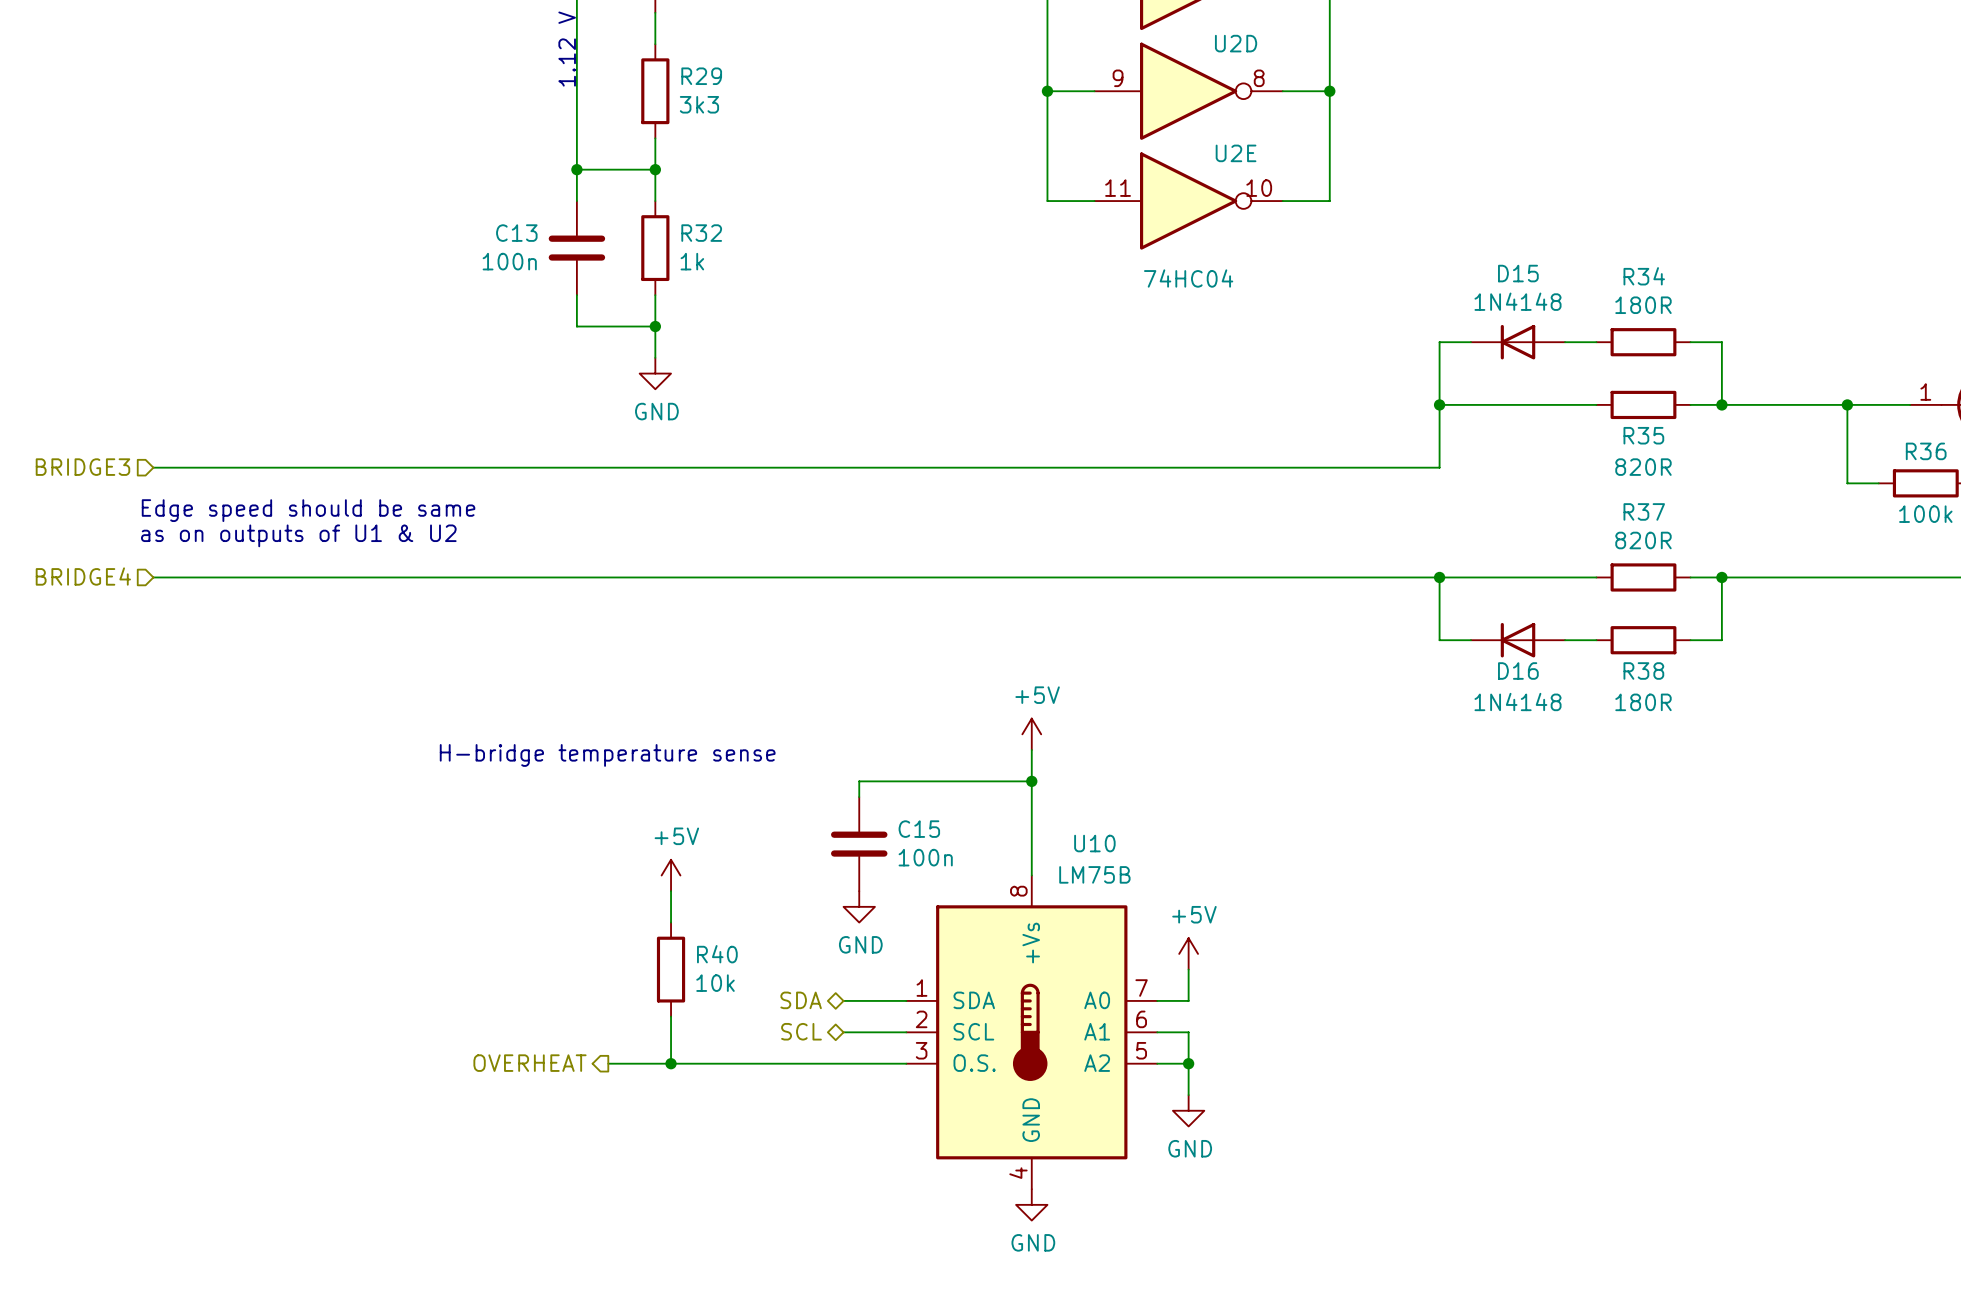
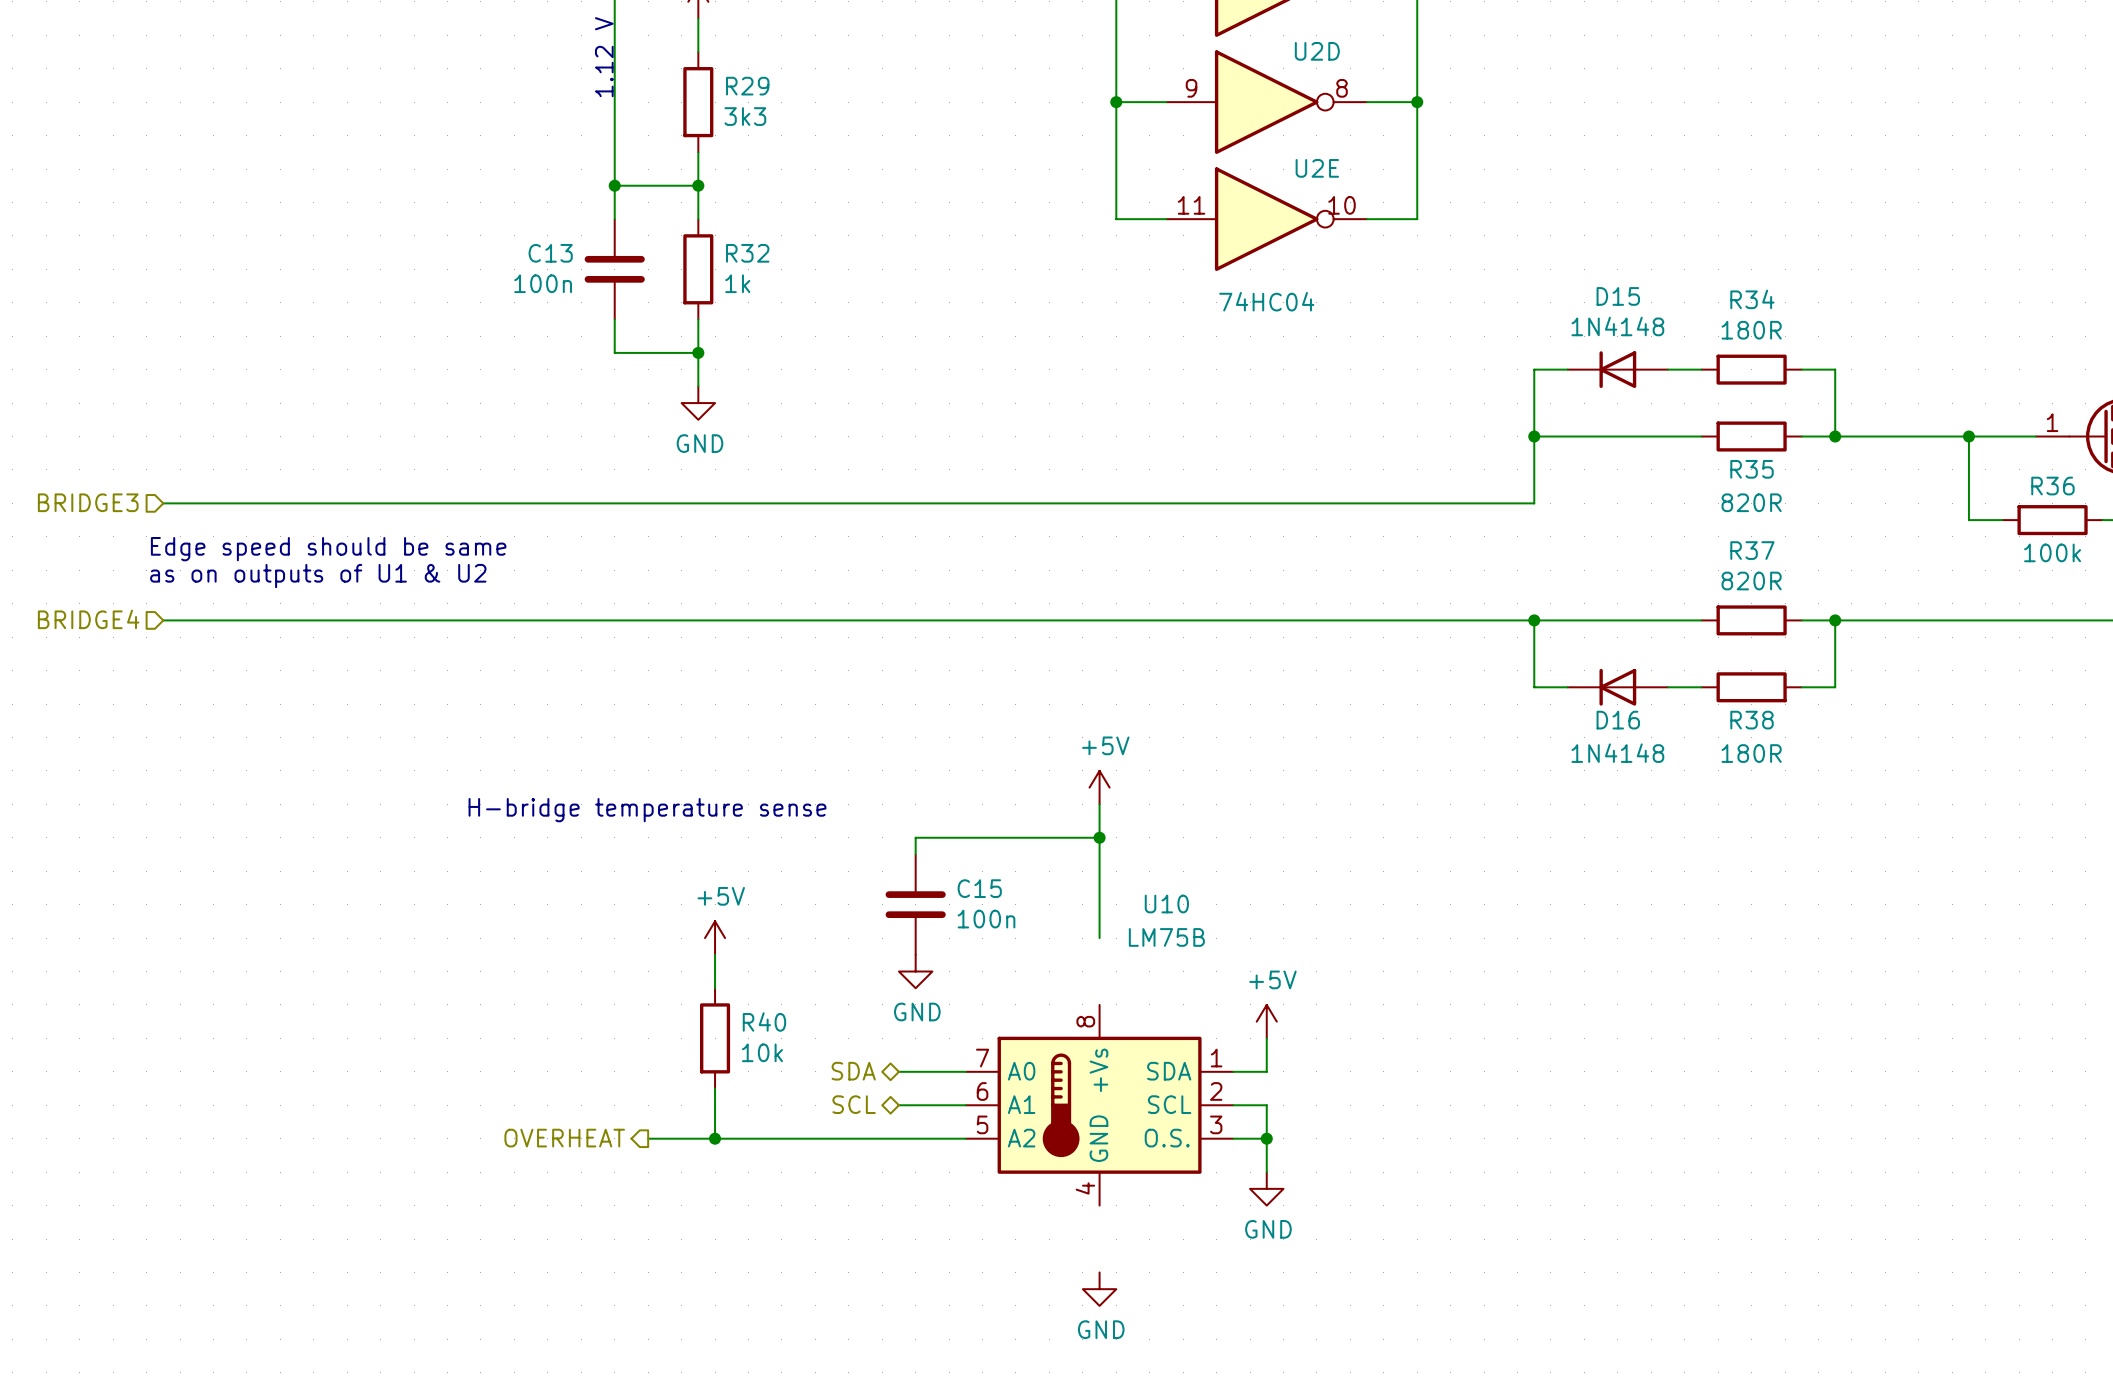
U10 symbol: [906, 875, 1158, 1190] -> [965, 1004, 1234, 1206]

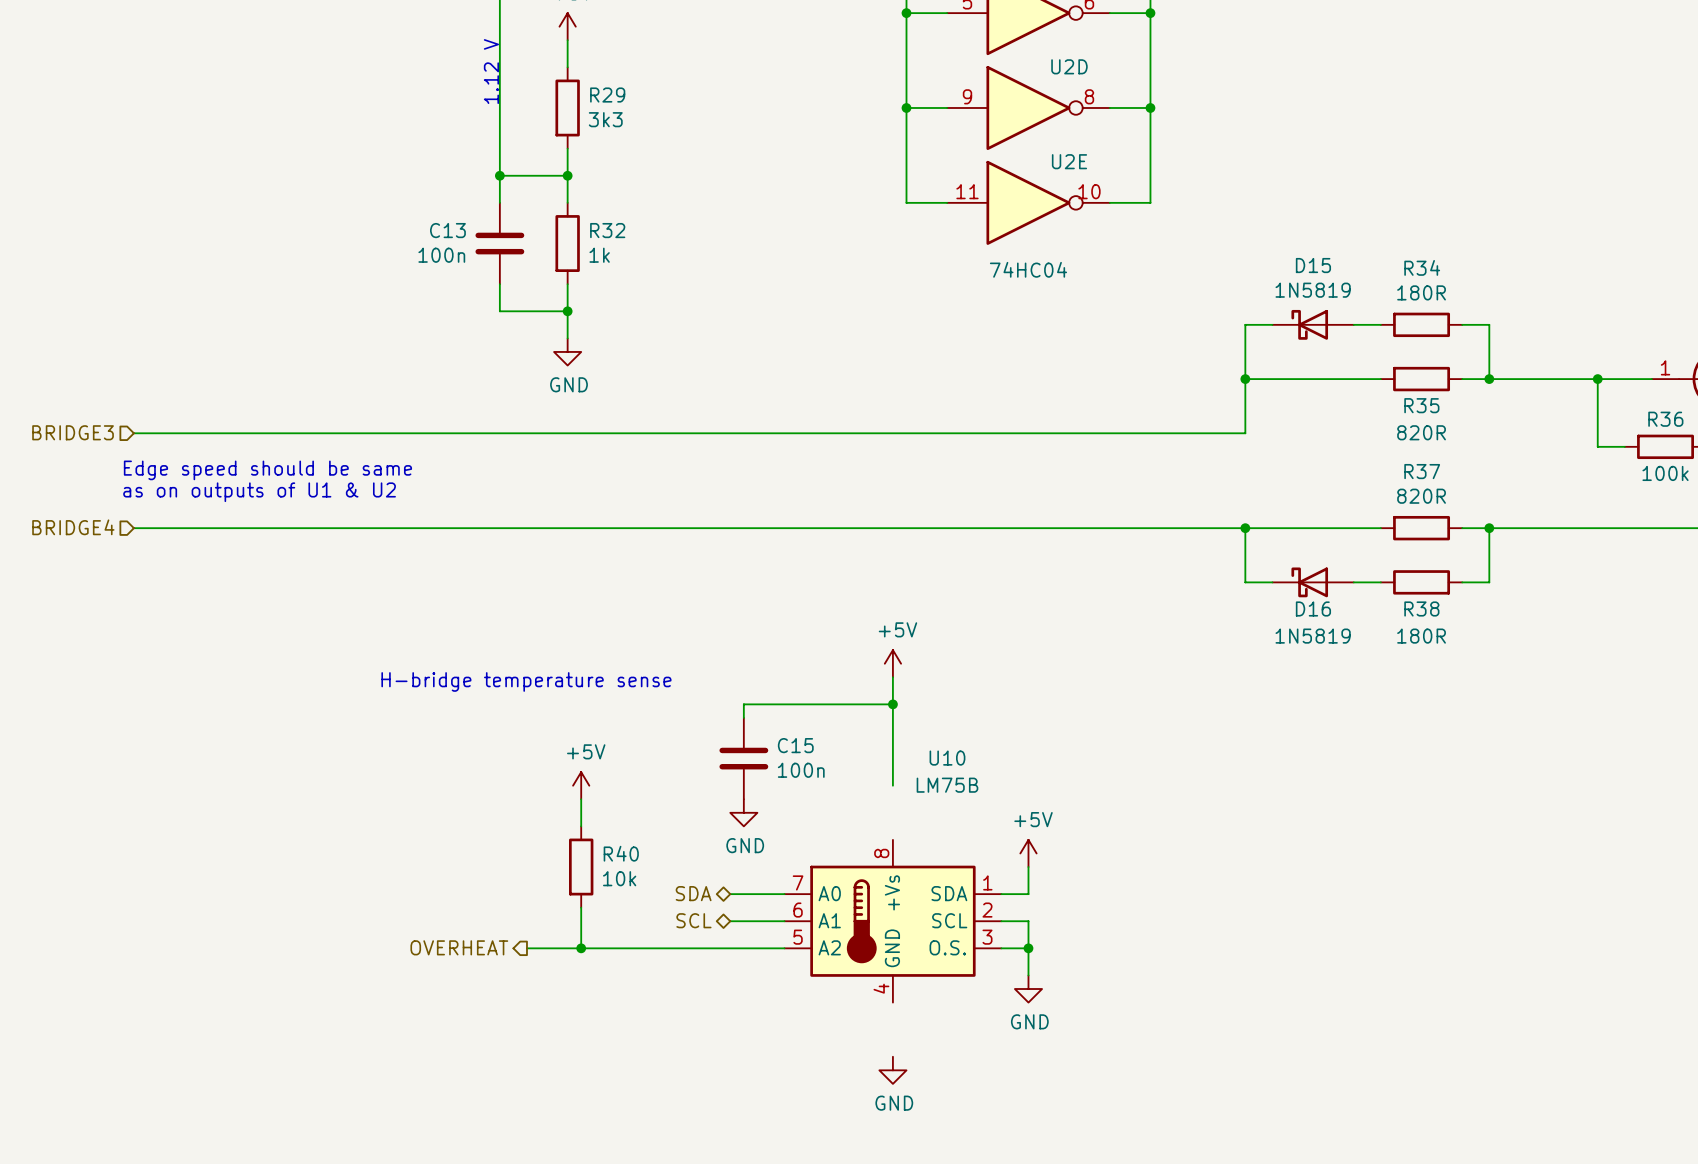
D15 value: 1N4148 (1617, 326) -> 1N5819 (1313, 290)
D15 symbol: [1567, 351, 1669, 389] -> [1272, 309, 1354, 340]
D16 symbol: [1567, 668, 1669, 706] -> [1272, 567, 1354, 598]
D16 value: 1N4148 (1617, 753) -> 1N5819 (1313, 636)

